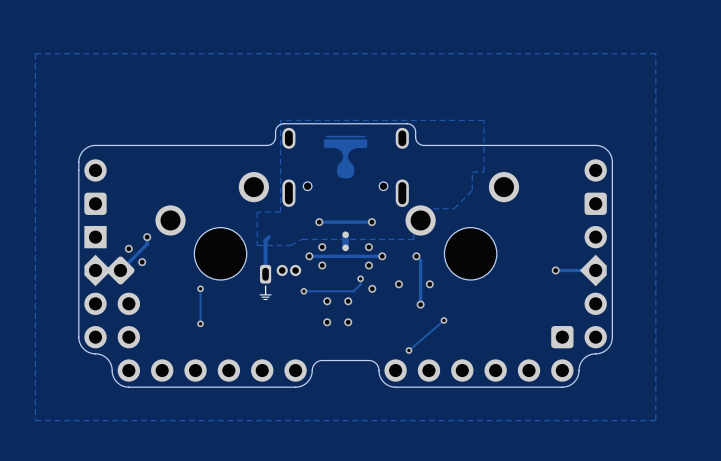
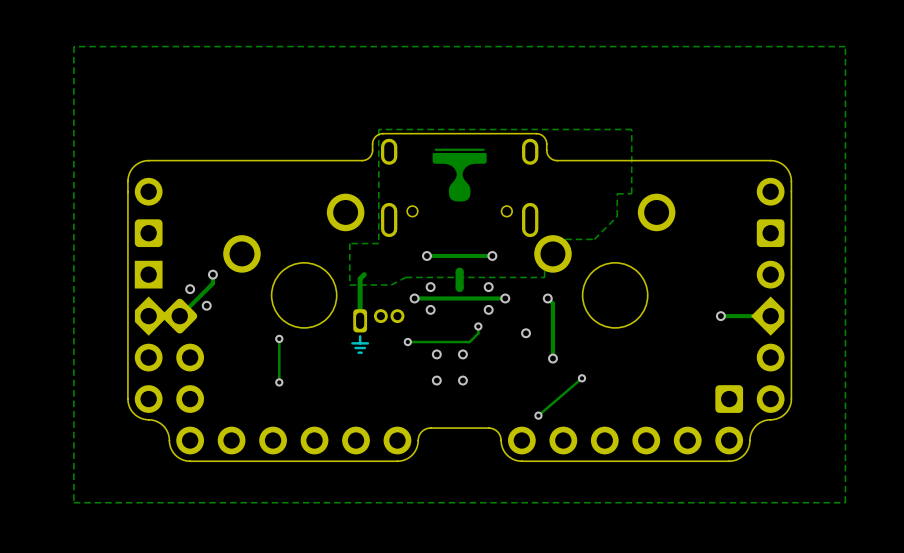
via: (429, 284) -> none
via: (372, 288) -> none

